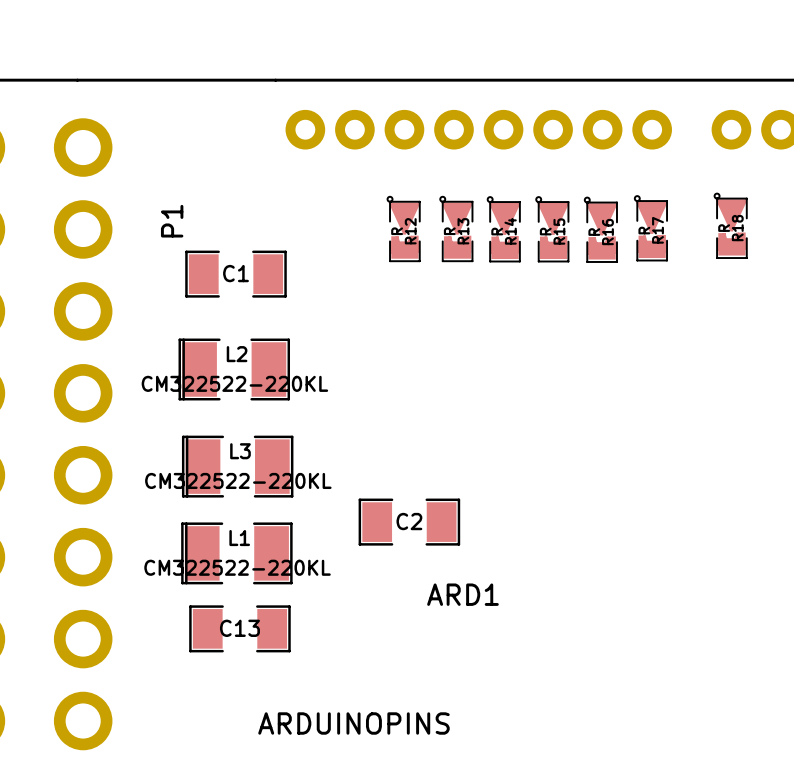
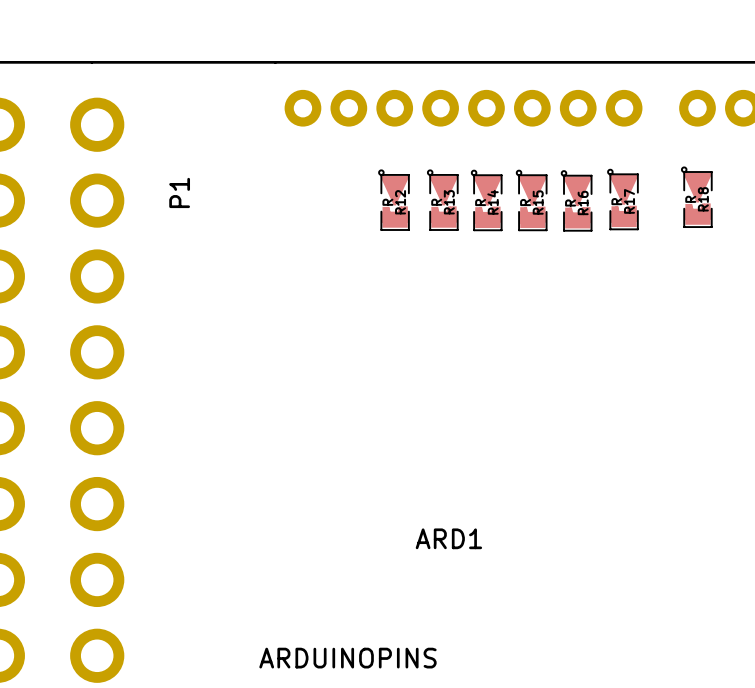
C1: (236, 274) -> none
L2: CM322522-220KL (234, 369) -> none
L3: CM322522-220KL (237, 466) -> none
C2: (409, 522) -> none
L1: CM322522-220KL (236, 553) -> none
C13: (239, 628) -> none

